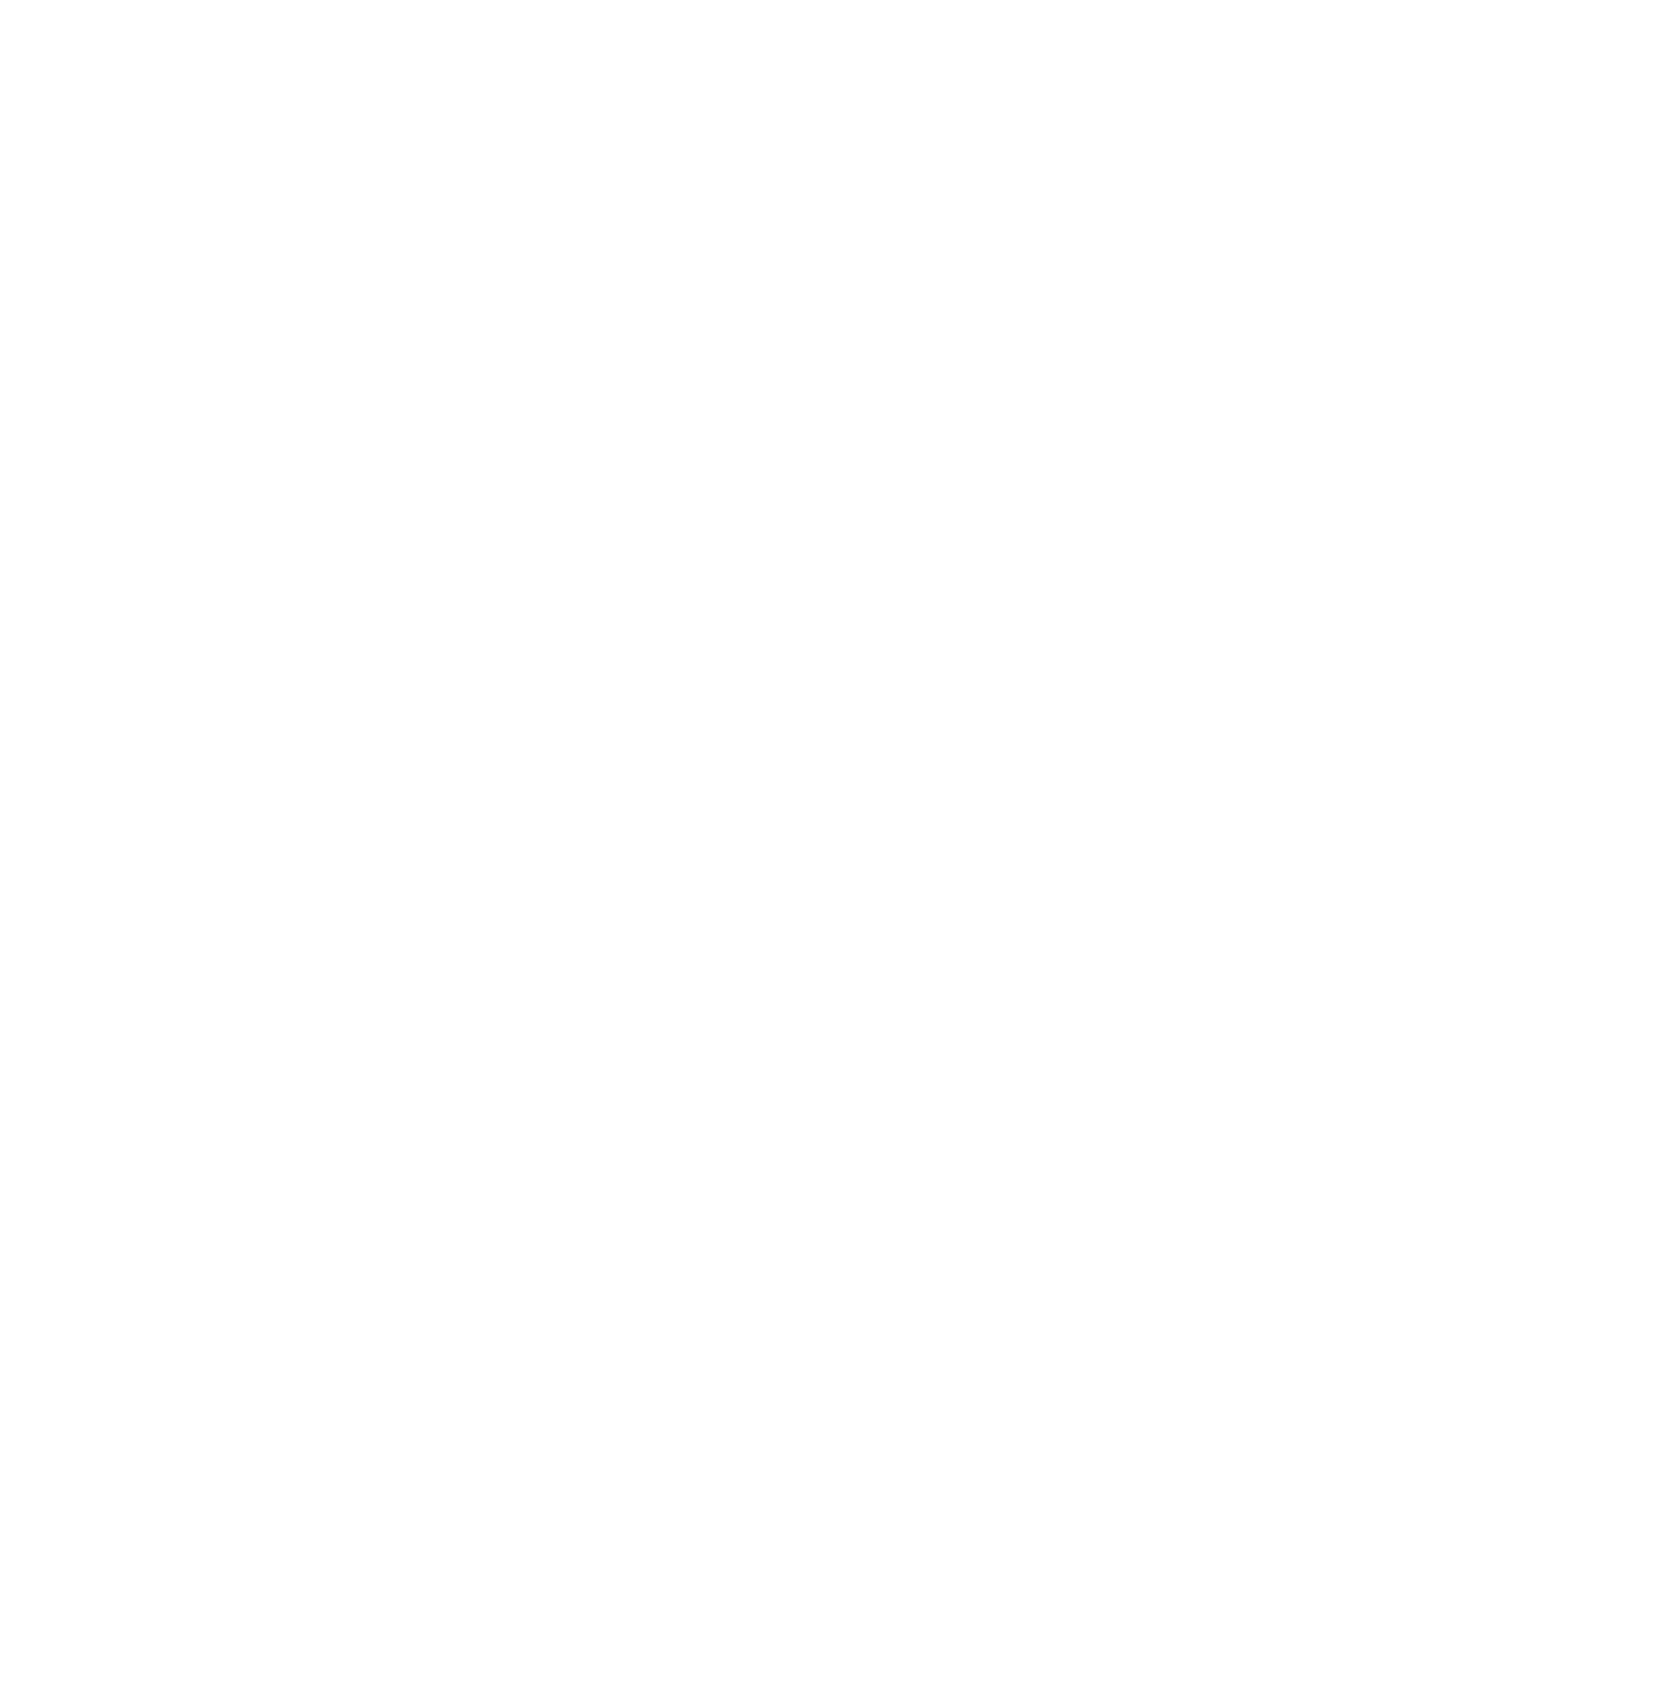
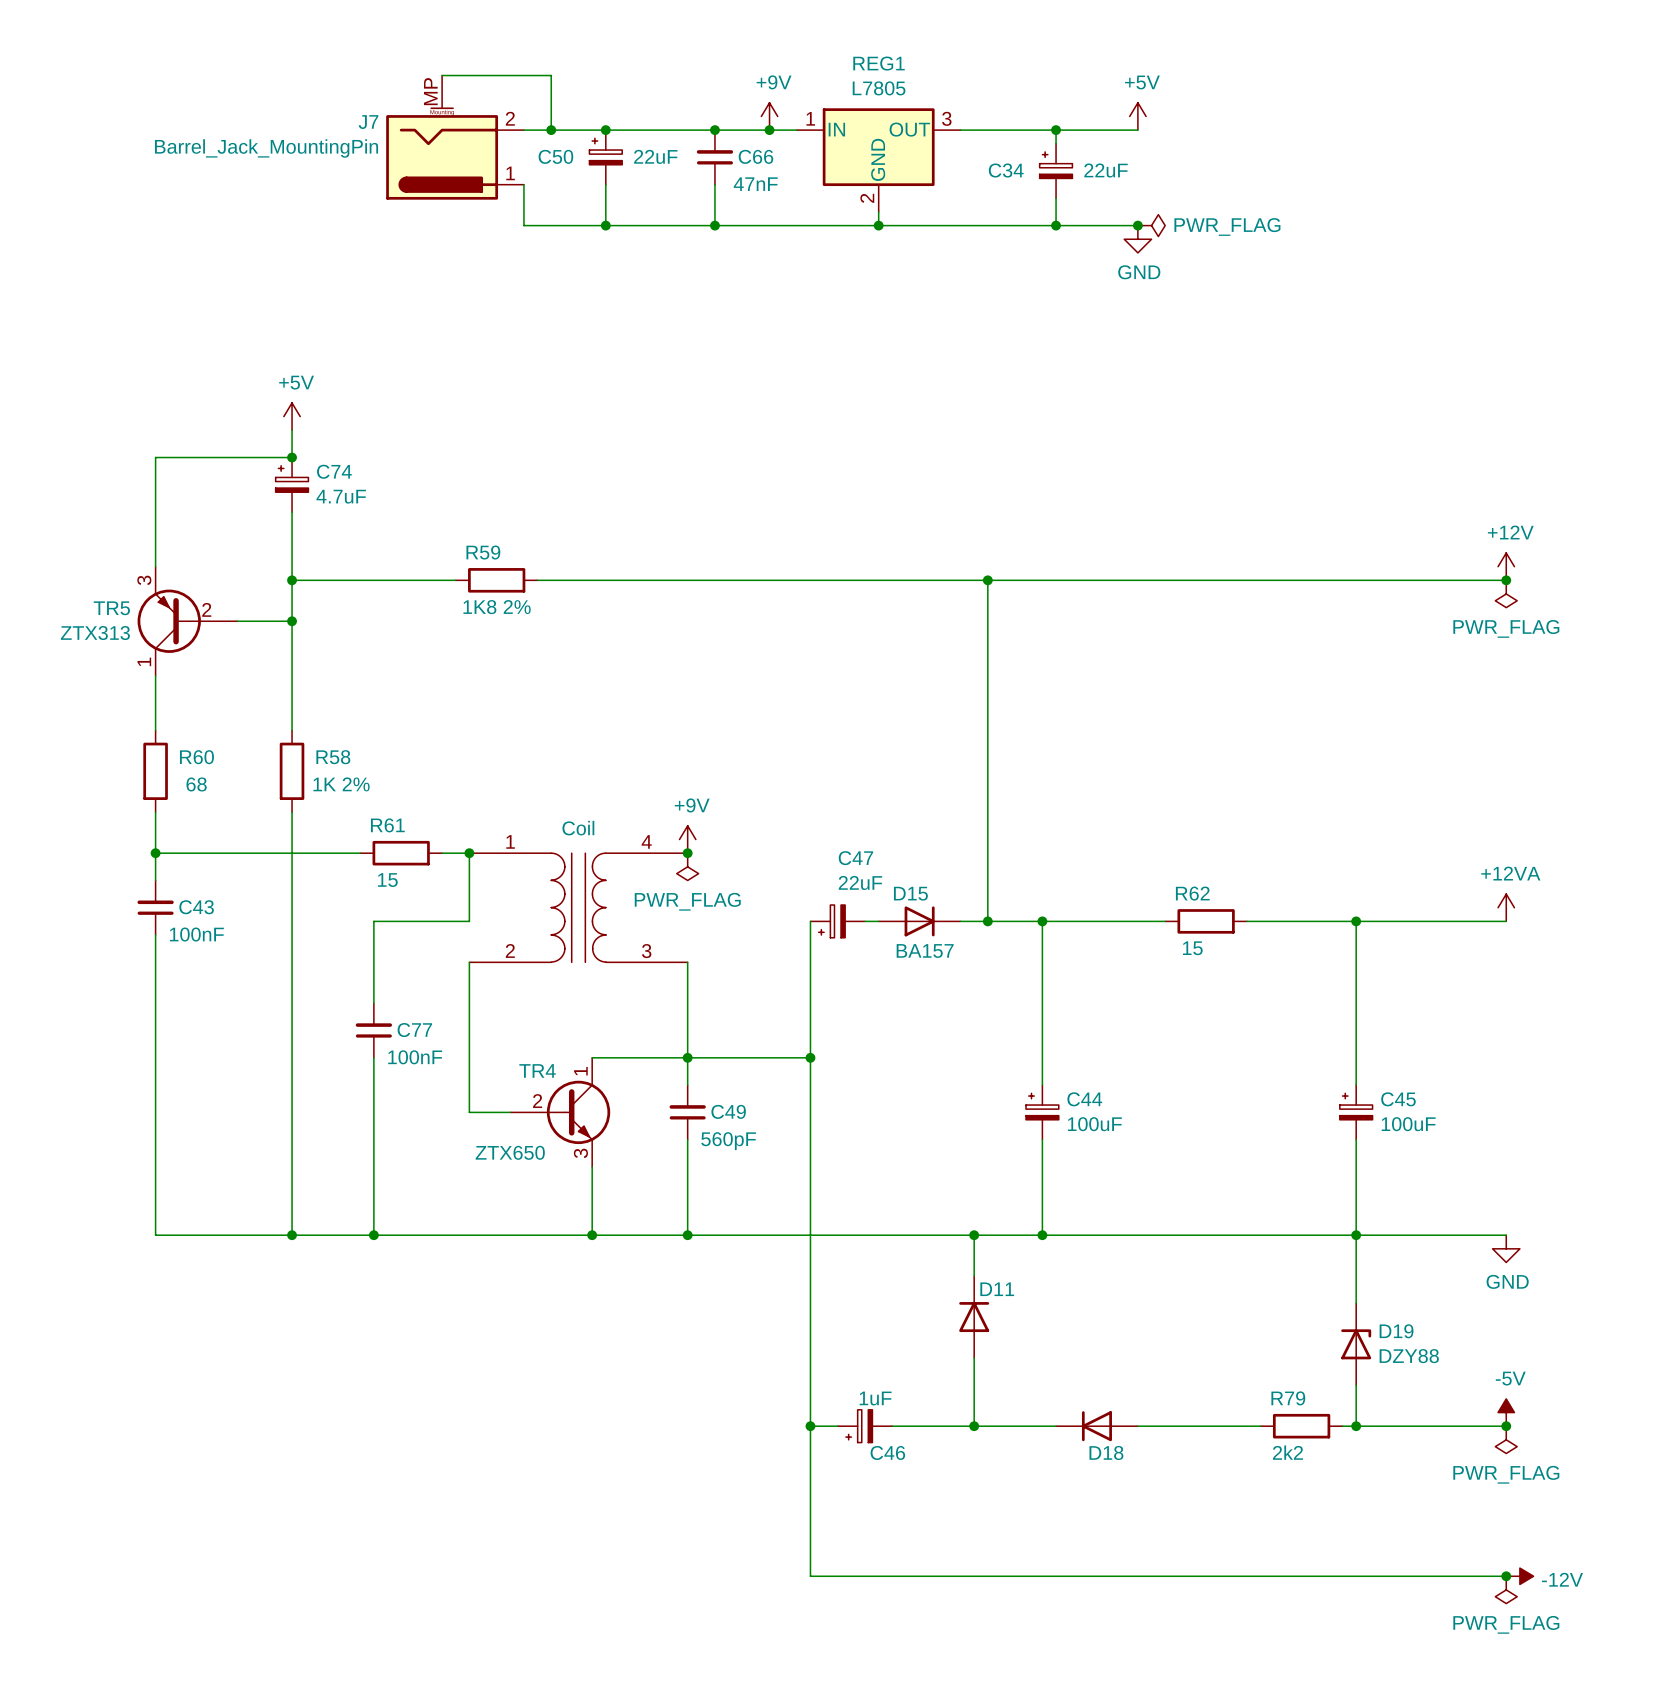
wire: none -> (442, 75) (551, 75) (551, 130)
power symbol: none -> +9V (769, 116)
power symbol: none -> +5V (1137, 116)
wire: none -> (523, 130) (796, 130)
junction: none -> (551, 130)
junction: none -> (605, 130)
junction: none -> (714, 130)
junction: none -> (769, 130)
wire: none -> (960, 130) (1137, 130)
wire: none -> (1056, 130) (1056, 143)
junction: none -> (1056, 130)
J7: none -> Barrel_Jack_MountingPin (455, 137)
C50: none -> 22uF (605, 157)
C66: none -> 47nF (714, 157)
REG1: none -> L7805 (878, 160)
C34: none -> 22uF (1056, 171)
wire: none -> (523, 184) (523, 225) (1137, 225)
wire: none -> (605, 184) (605, 225)
wire: none -> (714, 184) (714, 225)
wire: none -> (1056, 198) (1056, 225)
wire: none -> (878, 211) (878, 225)
junction: none -> (605, 225)
junction: none -> (714, 225)
junction: none -> (878, 225)
junction: none -> (1056, 225)
junction: none -> (1137, 225)
power symbol: none -> PWR_FLAG (1151, 225)
power symbol: none -> GND (1137, 239)
power symbol: none -> +5V (292, 416)
wire: none -> (292, 430) (292, 457) (155, 457) (155, 566)
junction: none -> (292, 457)
C74: none -> 4.7uF (292, 484)
wire: none -> (292, 512) (292, 730)
power symbol: none -> +12V (1506, 566)
wire: none -> (292, 580) (455, 580)
junction: none -> (292, 580)
R59: none -> 1K8 2% (496, 580)
wire: none -> (537, 580) (1506, 580)
wire: none -> (987, 580) (987, 921)
junction: none -> (987, 580)
junction: none -> (1506, 580)
power symbol: none -> PWR_FLAG (1506, 593)
TR5: none -> ZTX313 (187, 621)
wire: none -> (237, 621) (292, 621)
junction: none -> (292, 621)
wire: none -> (155, 675) (155, 730)
R60: none -> 68 (155, 771)
R58: none -> 1K 2% (292, 771)
wire: none -> (155, 812) (155, 880)
wire: none -> (292, 812) (292, 1235)
power symbol: none -> +9V (687, 839)
wire: none -> (155, 853) (360, 853)
junction: none -> (155, 853)
R61: none -> 15 (401, 853)
wire: none -> (442, 853) (469, 853) (469, 921) (373, 921) (373, 1003)
junction: none -> (469, 853)
junction: none -> (687, 853)
power symbol: none -> PWR_FLAG (687, 866)
C43: none -> 100nF (155, 907)
part: none -> Coil (578, 907)
power symbol: none -> +12VA (1506, 907)
wire: none -> (810, 921) (810, 1576) (1506, 1576)
C47: none -> 22uF (837, 921)
wire: none -> (865, 921) (878, 921)
D15: none -> BA157 (919, 921)
wire: none -> (960, 921) (1165, 921)
junction: none -> (987, 921)
wire: none -> (1042, 921) (1042, 1085)
junction: none -> (1042, 921)
R62: none -> 15 (1206, 921)
wire: none -> (1247, 921) (1506, 921)
wire: none -> (1356, 921) (1356, 1085)
junction: none -> (1356, 921)
wire: none -> (155, 935) (155, 1235) (1506, 1235)
wire: none -> (469, 962) (469, 1112) (510, 1112)
wire: none -> (687, 962) (687, 1085)
C77: none -> 100nF (373, 1030)
wire: none -> (373, 1057) (373, 1235)
wire: none -> (592, 1057) (810, 1057)
junction: none -> (687, 1057)
junction: none -> (810, 1057)
TR4: none -> ZTX650 (560, 1112)
C49: none -> 560pF (687, 1112)
C44: none -> 100uF (1042, 1112)
C45: none -> 100uF (1356, 1112)
wire: none -> (687, 1139) (687, 1235)
wire: none -> (1042, 1139) (1042, 1235)
wire: none -> (1356, 1139) (1356, 1303)
wire: none -> (592, 1166) (592, 1235)
junction: none -> (292, 1235)
junction: none -> (373, 1235)
junction: none -> (592, 1235)
junction: none -> (687, 1235)
wire: none -> (974, 1235) (974, 1276)
junction: none -> (974, 1235)
junction: none -> (1042, 1235)
junction: none -> (1356, 1235)
power symbol: none -> GND (1506, 1248)
D11: none -> (974, 1317)
D19: none -> DZY88 (1356, 1344)
wire: none -> (974, 1357) (974, 1426)
wire: none -> (1356, 1385) (1356, 1426)
power symbol: none -> -5V (1506, 1412)
wire: none -> (810, 1426) (837, 1426)
junction: none -> (810, 1426)
C46: none -> 1uF (865, 1426)
wire: none -> (892, 1426) (1056, 1426)
junction: none -> (974, 1426)
D18: none -> (1096, 1426)
wire: none -> (1137, 1426) (1260, 1426)
R79: none -> 2k2 (1301, 1426)
wire: none -> (1342, 1426) (1506, 1426)
junction: none -> (1356, 1426)
junction: none -> (1506, 1426)
power symbol: none -> PWR_FLAG (1506, 1439)
junction: none -> (1506, 1576)
power symbol: none -> -12V (1519, 1576)
power symbol: none -> PWR_FLAG (1506, 1589)

